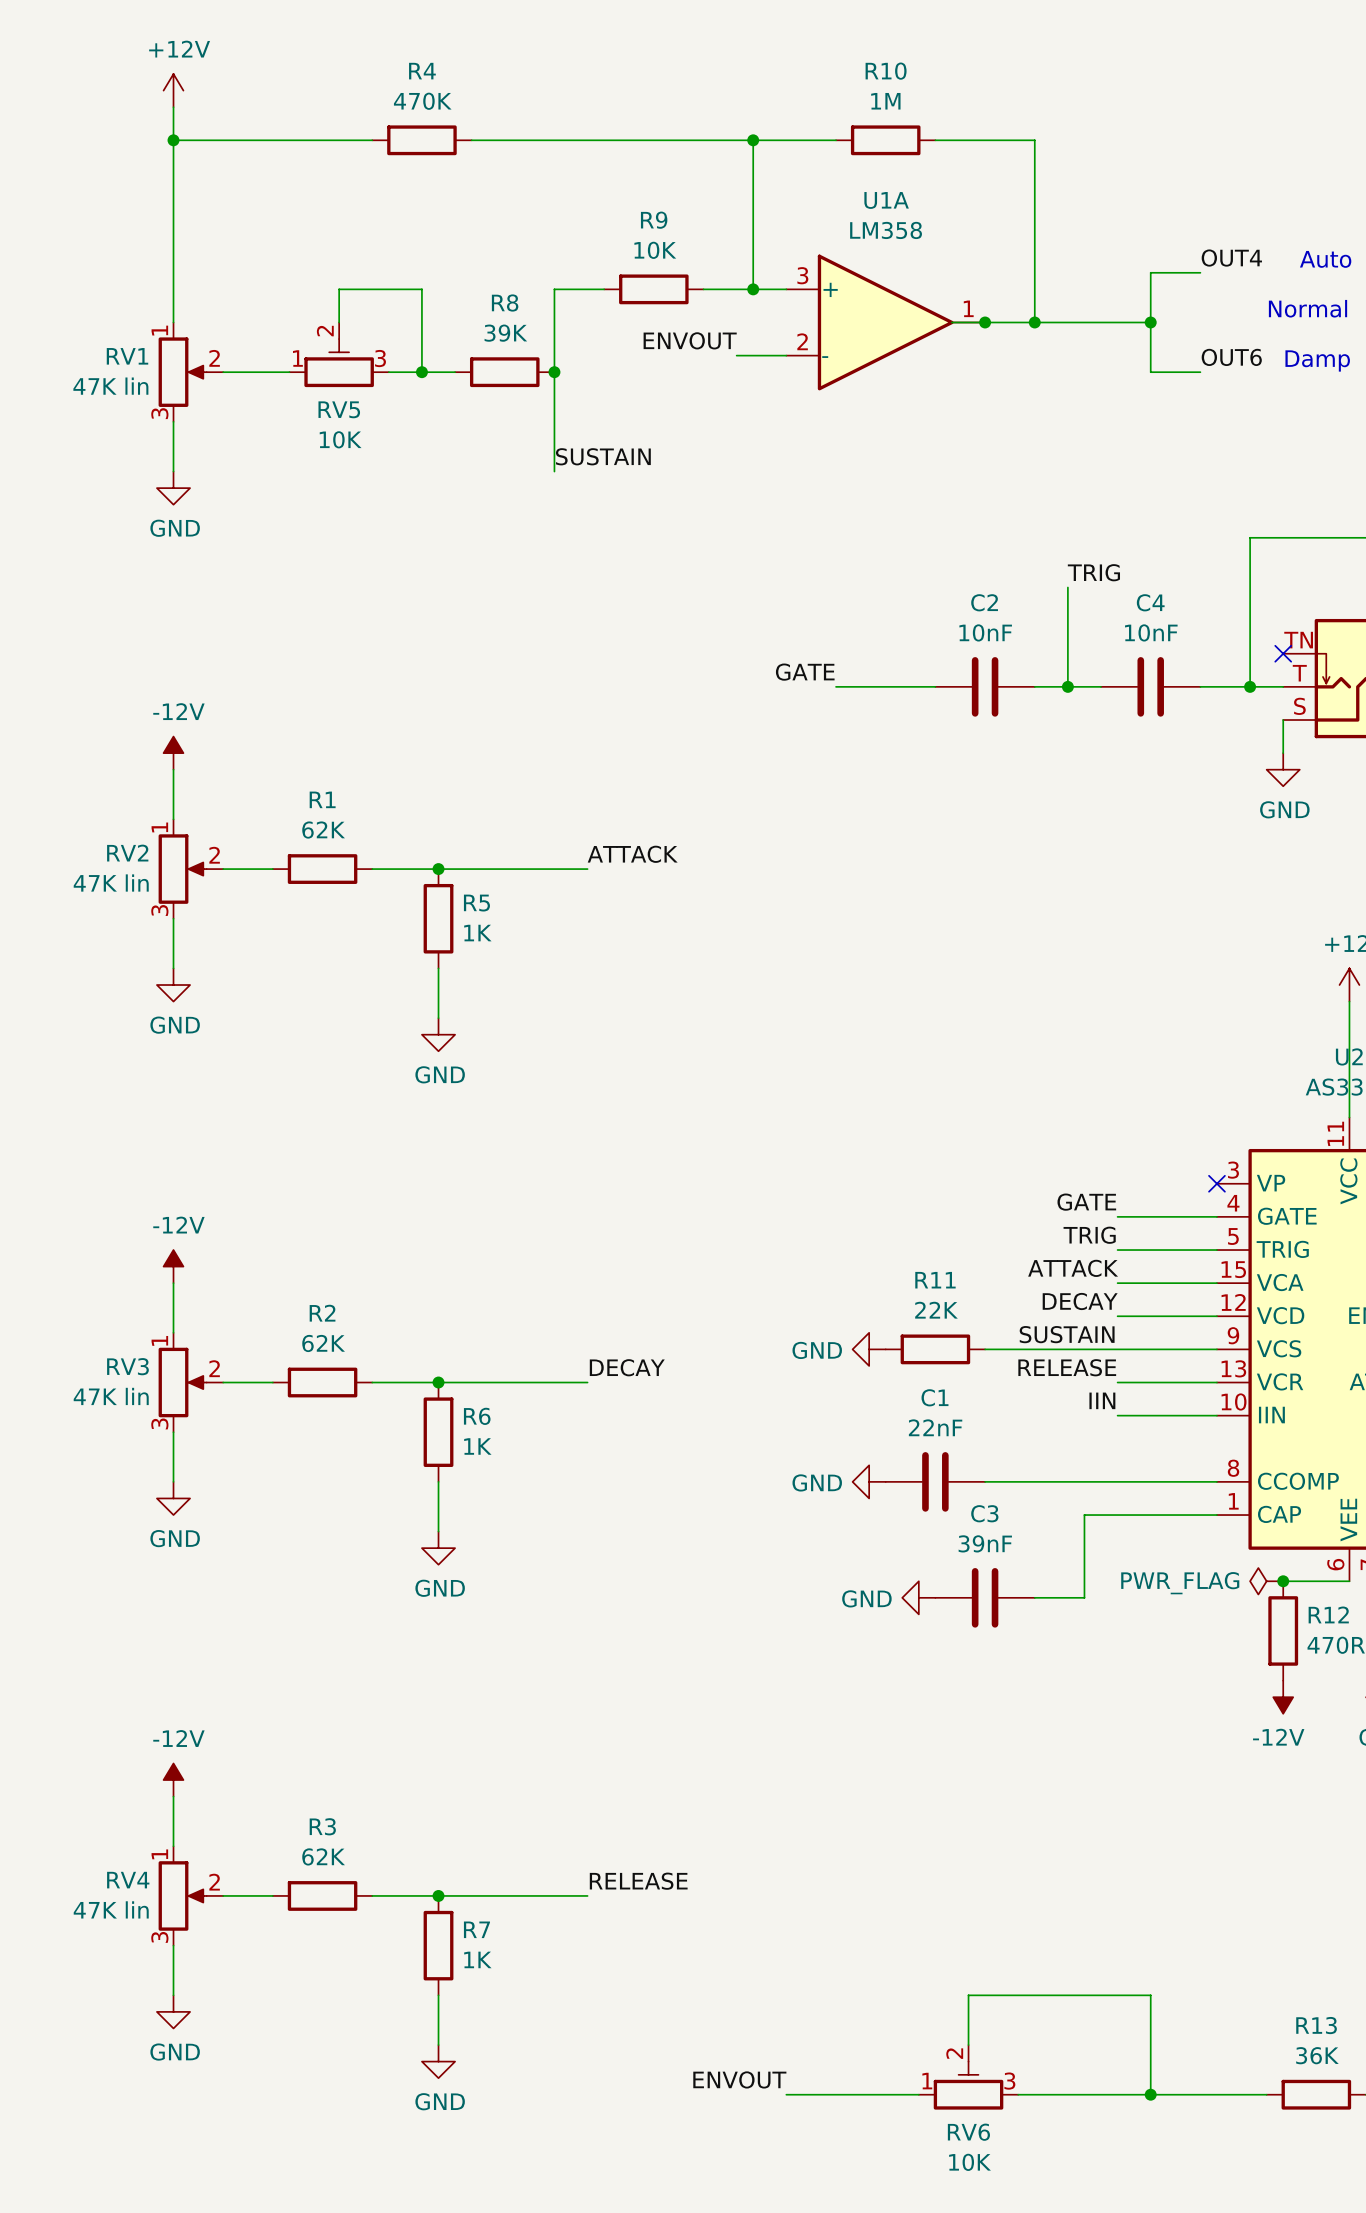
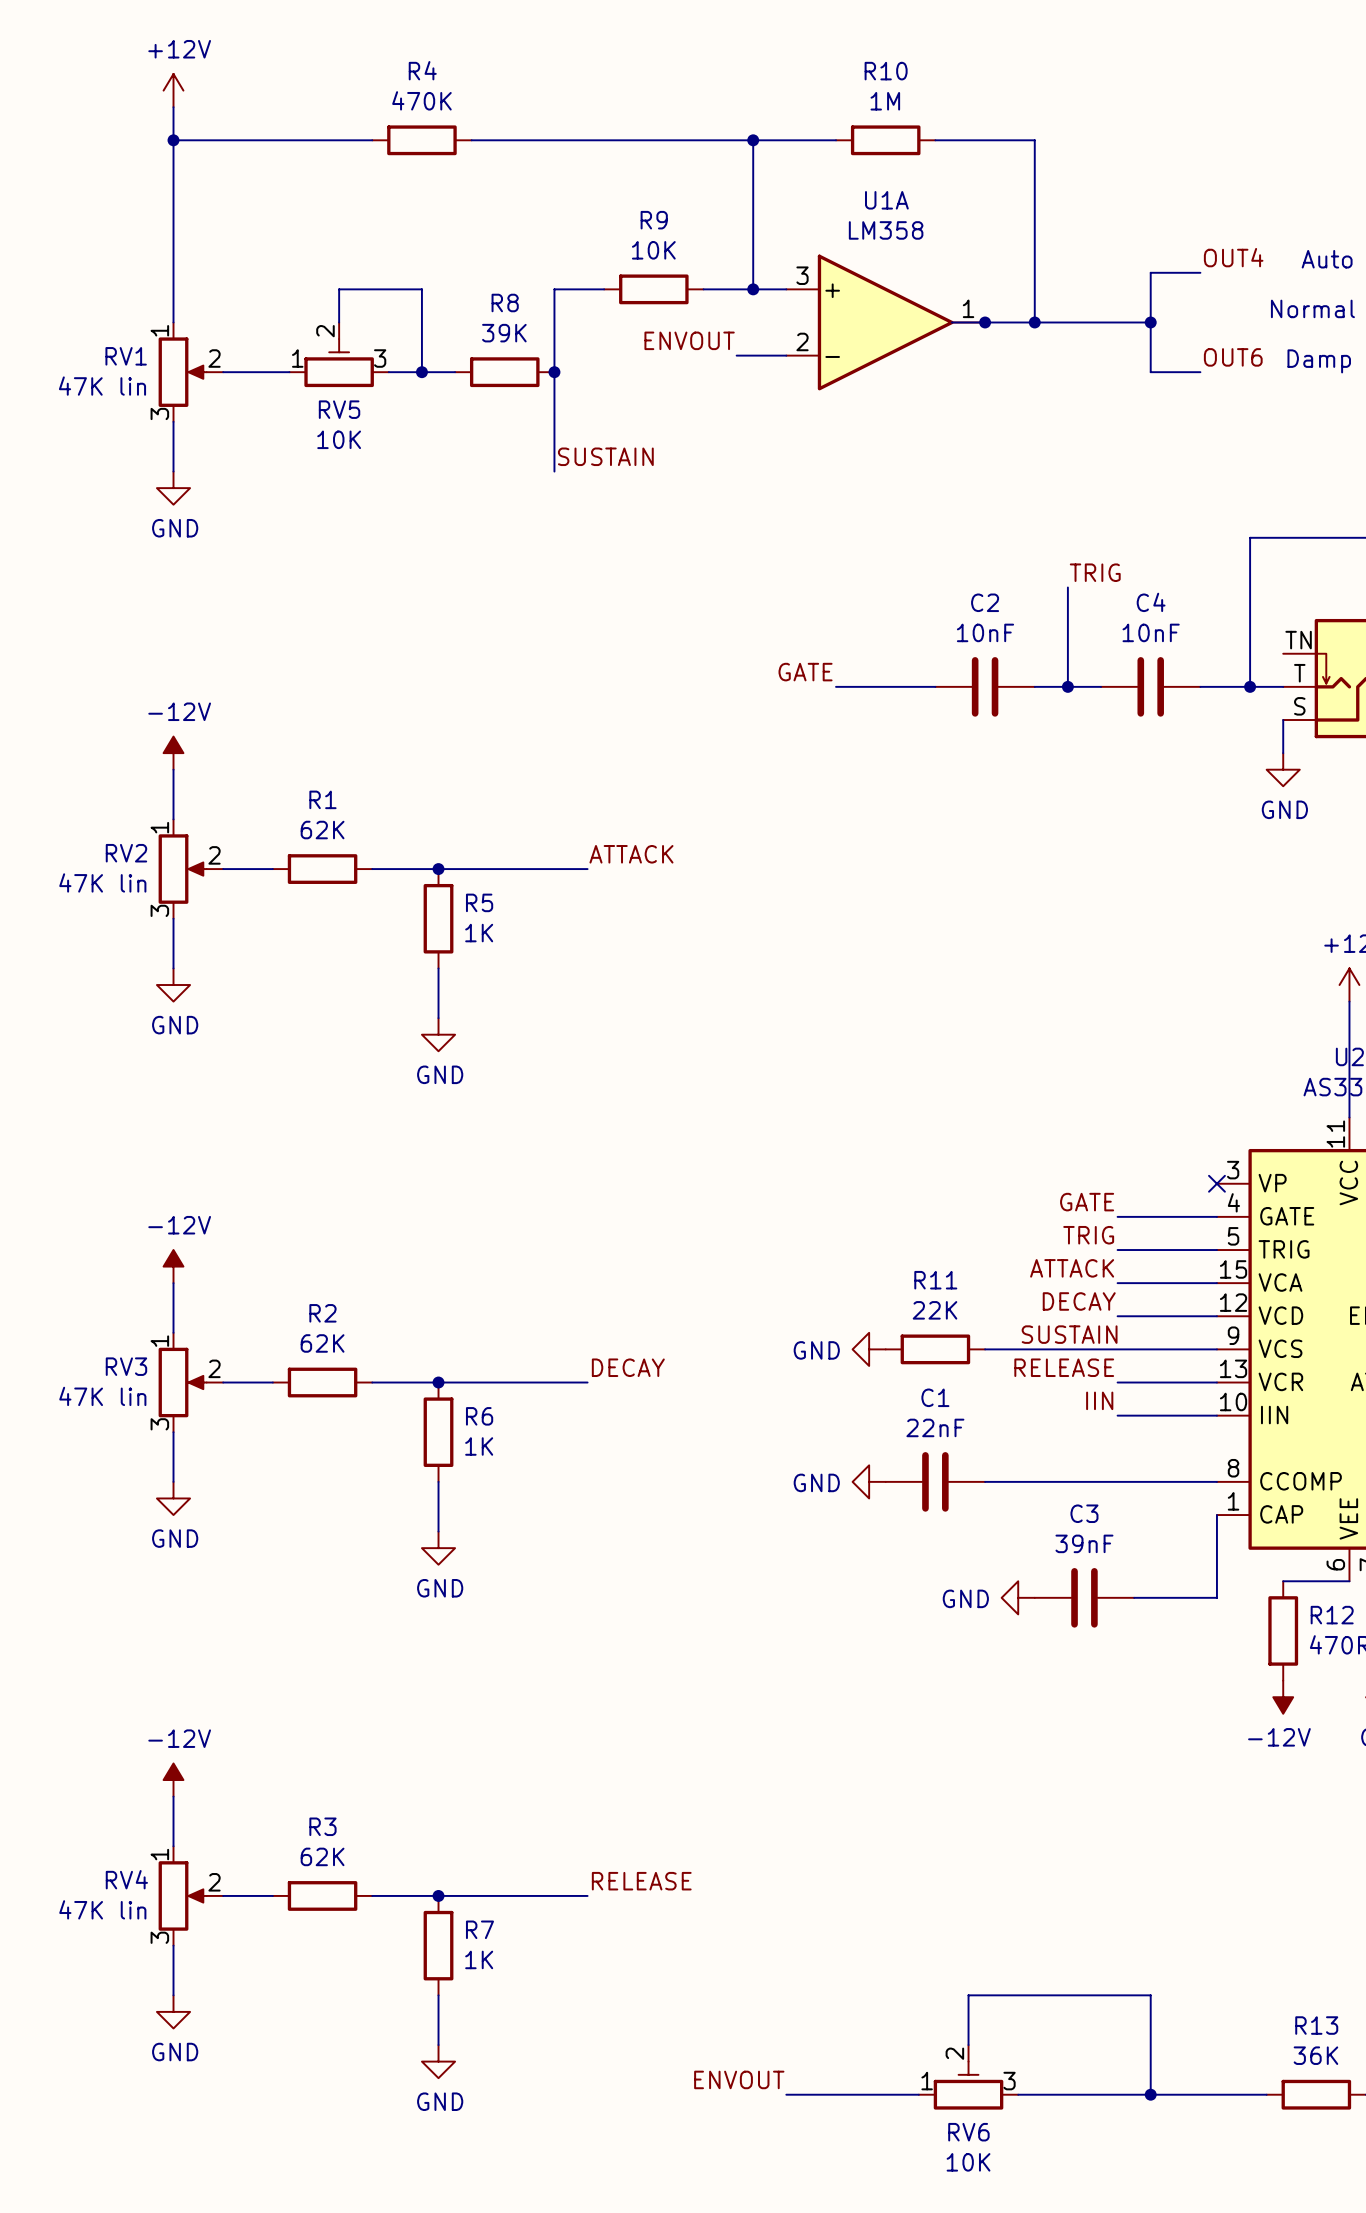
no-connect mark: (1283, 653) -> none
wire: (1216, 1515) (1084, 1515) (1084, 1597) (1034, 1597) -> (1216, 1515) (1216, 1597) (1134, 1597)
power symbol: PWR_FLAG (1266, 1581) -> none
junction: (1283, 1581) -> none
power symbol position: GND (918, 1597) -> GND (1018, 1597)
C3 position: (985, 1597) -> (1084, 1597)

